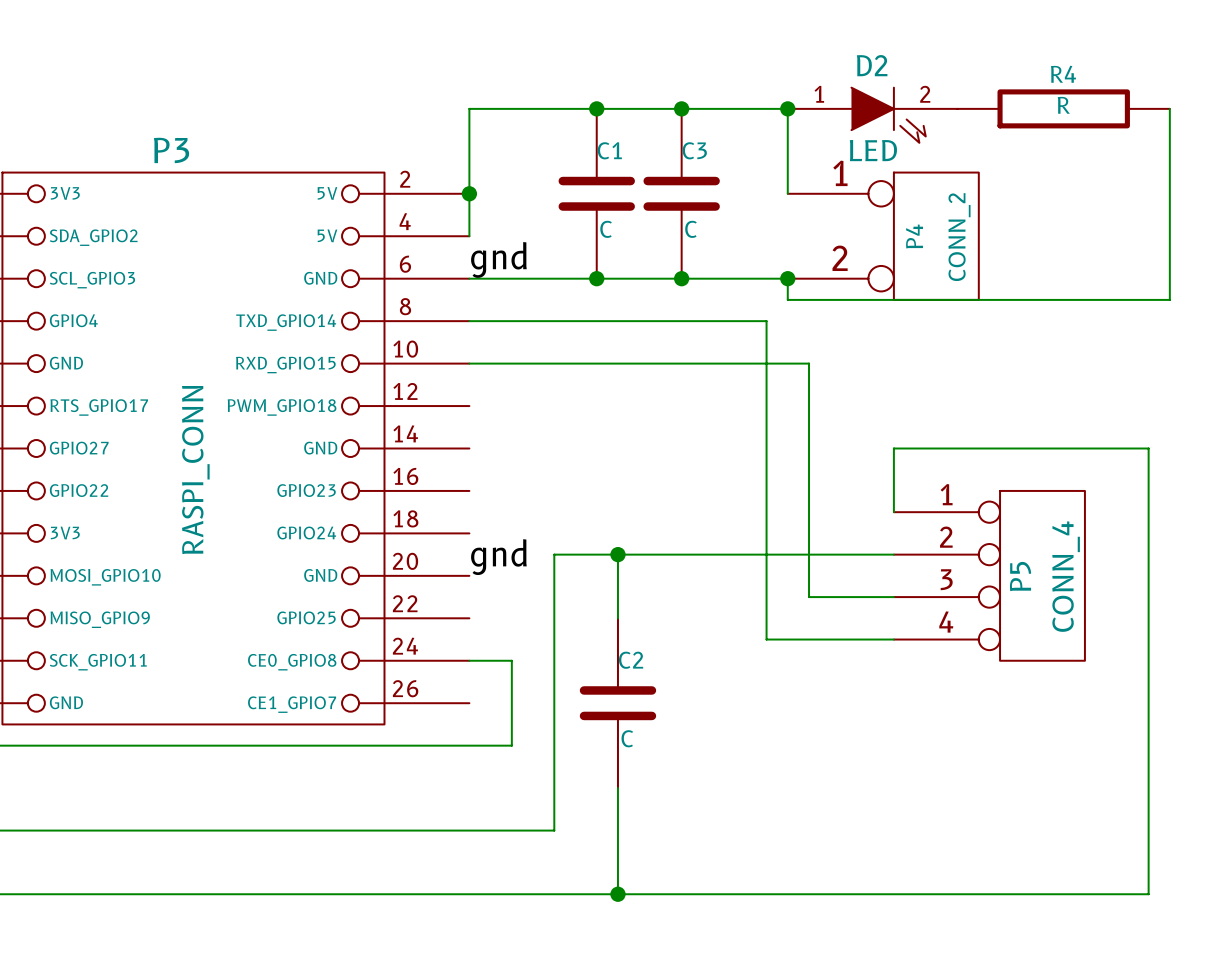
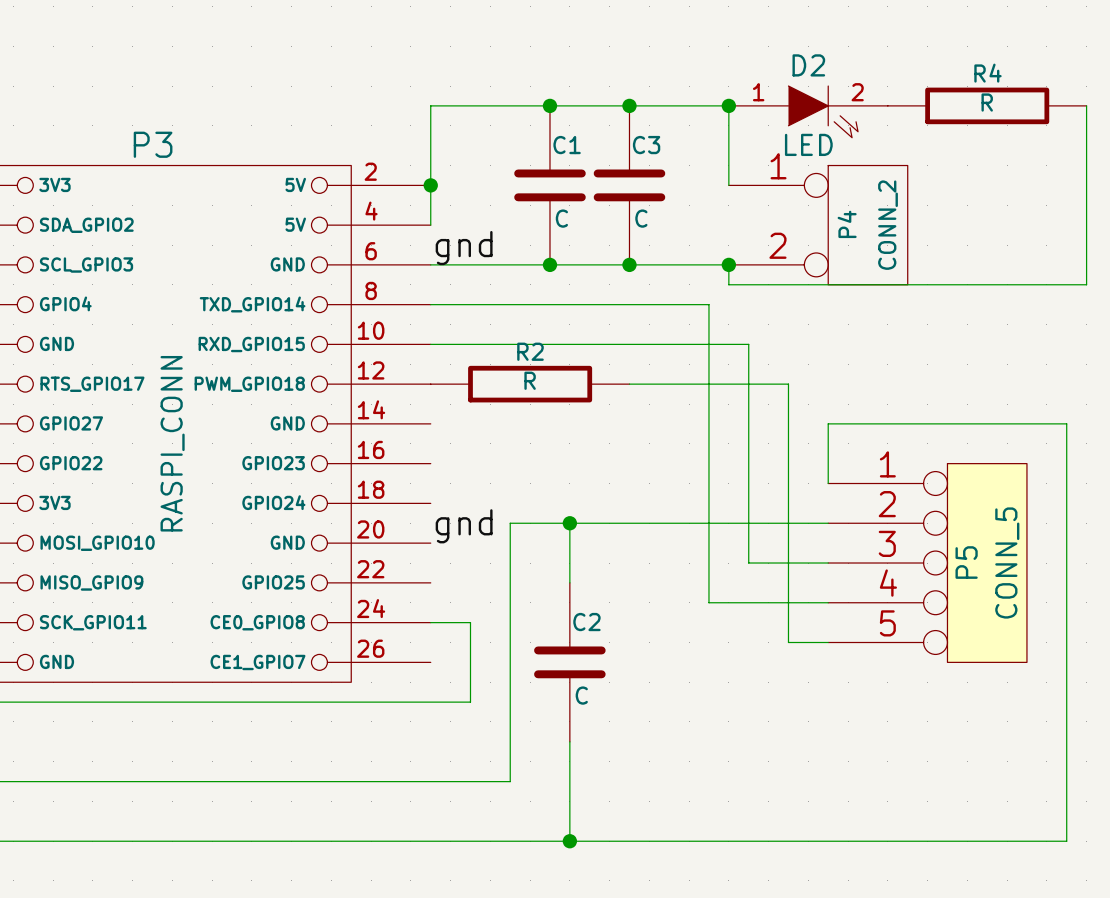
R2: none -> R (530, 384)
wire: none -> (629, 384) (788, 384) (788, 642) (828, 642)
P5 symbol: [893, 490, 1085, 661] -> [828, 463, 1027, 663]
P5 value: CONN_4 (1066, 576) -> CONN_5 (1007, 563)

